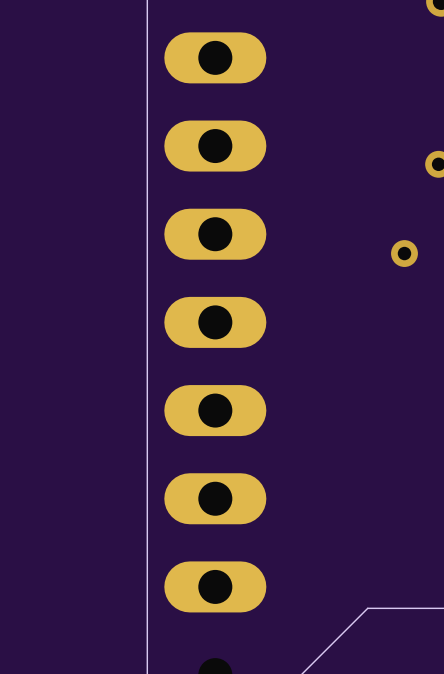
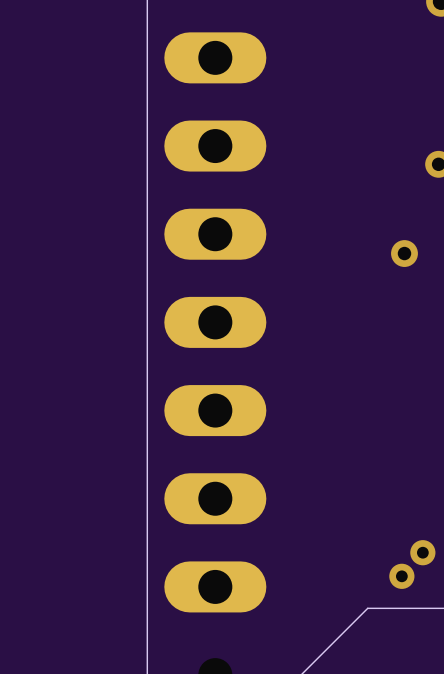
via: none -> (422, 552)
via: none -> (401, 576)

